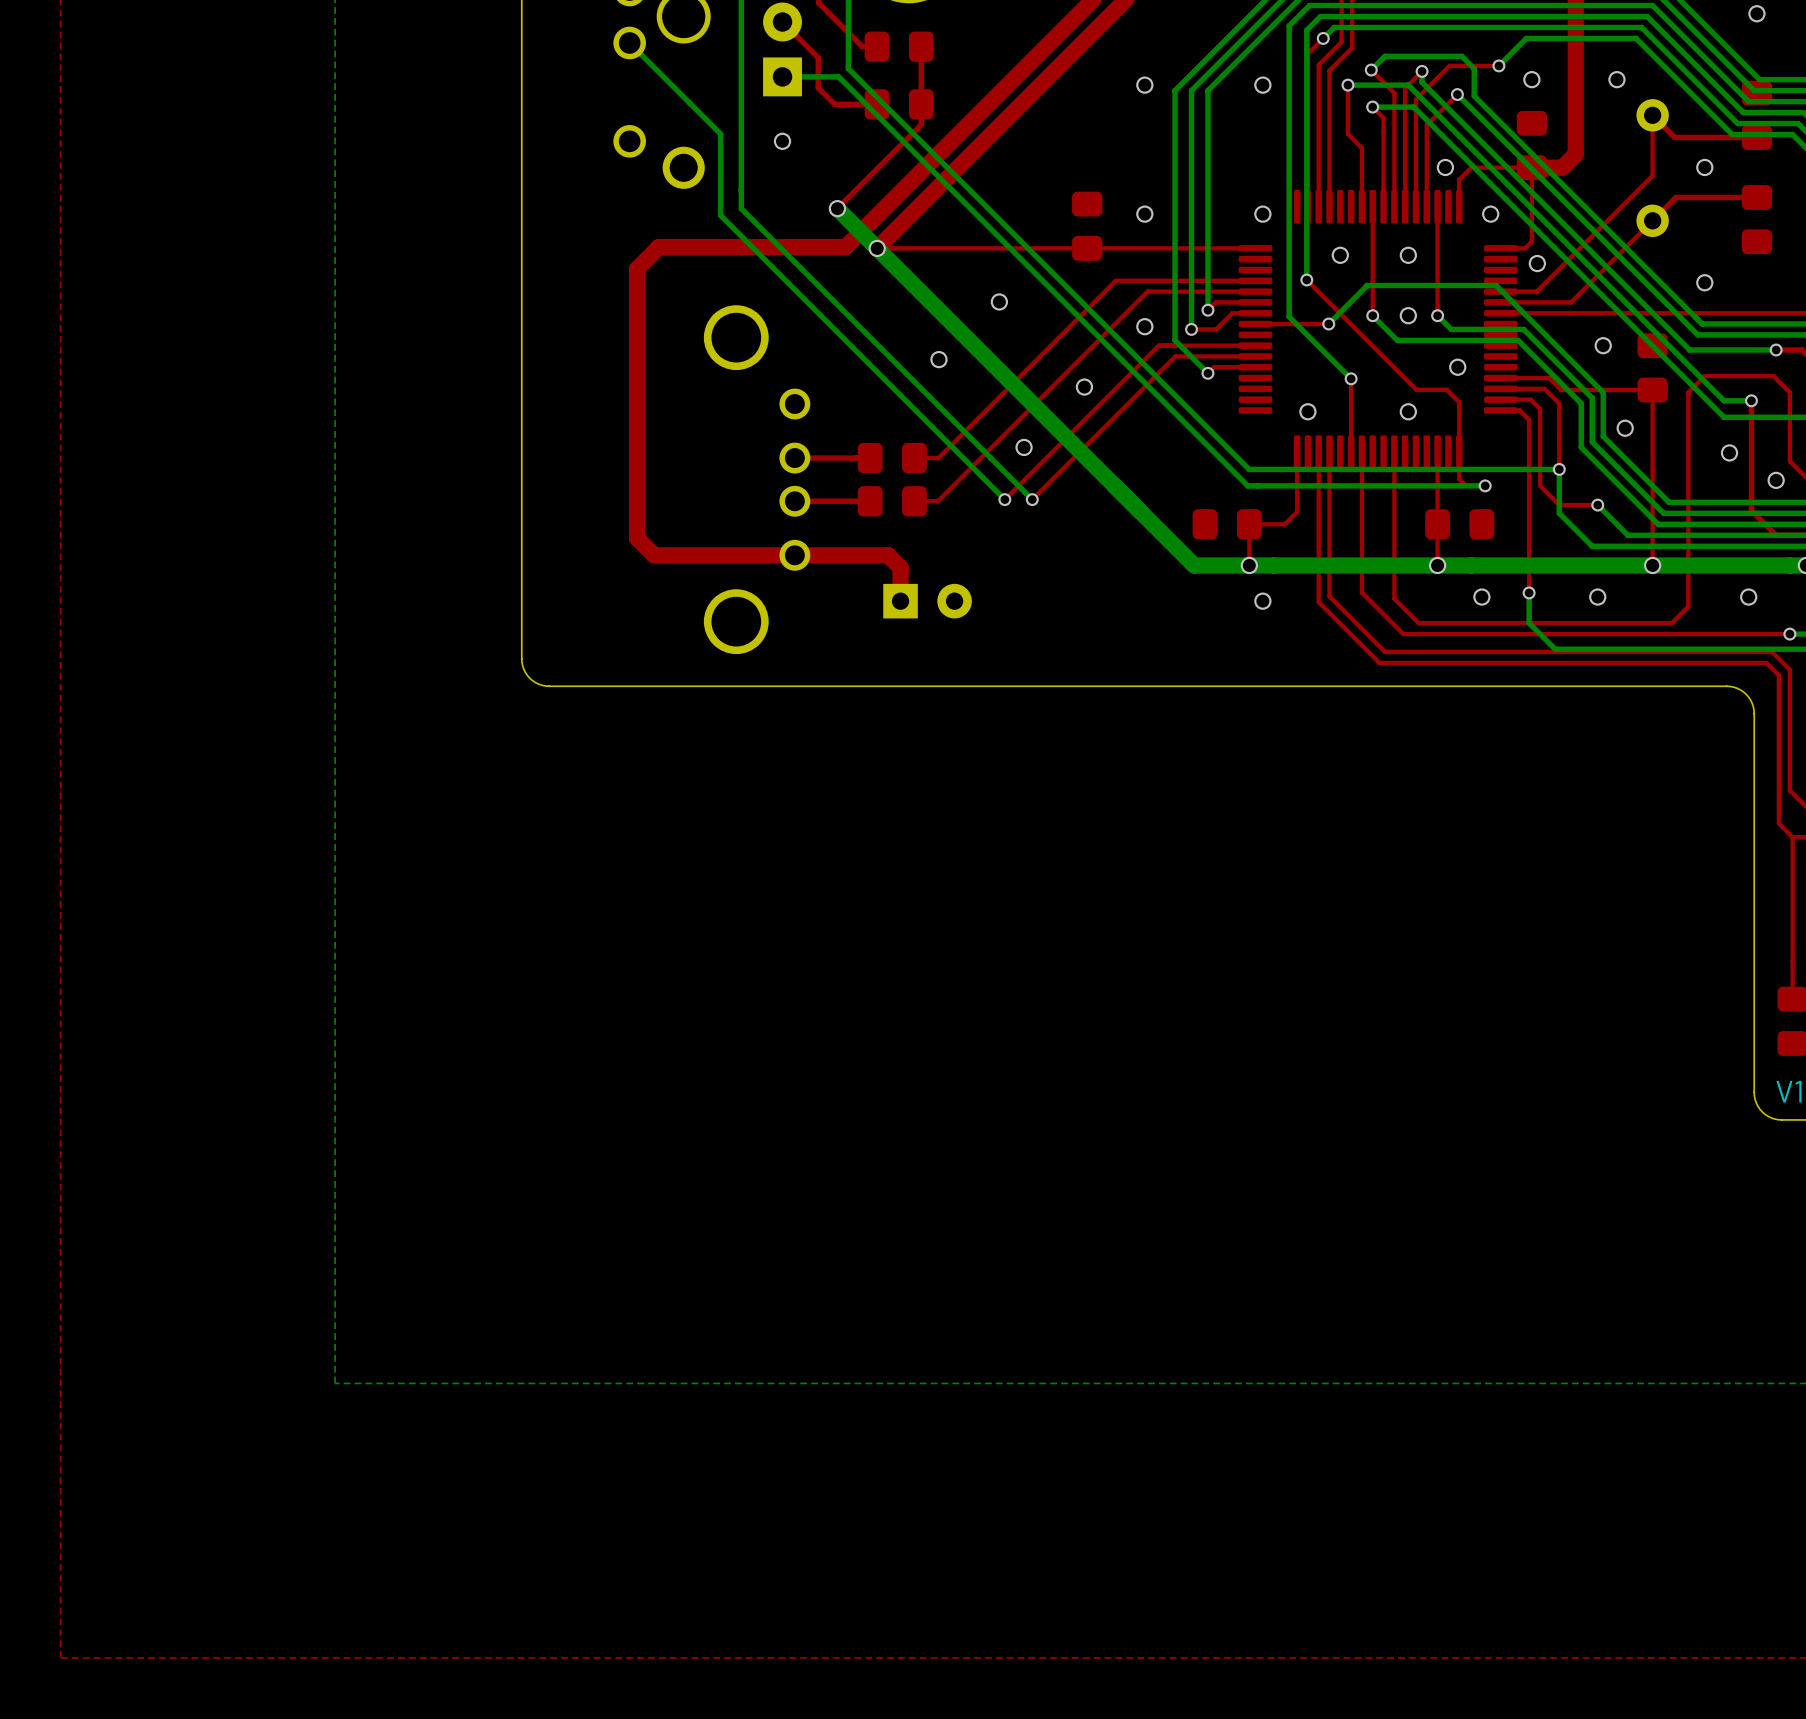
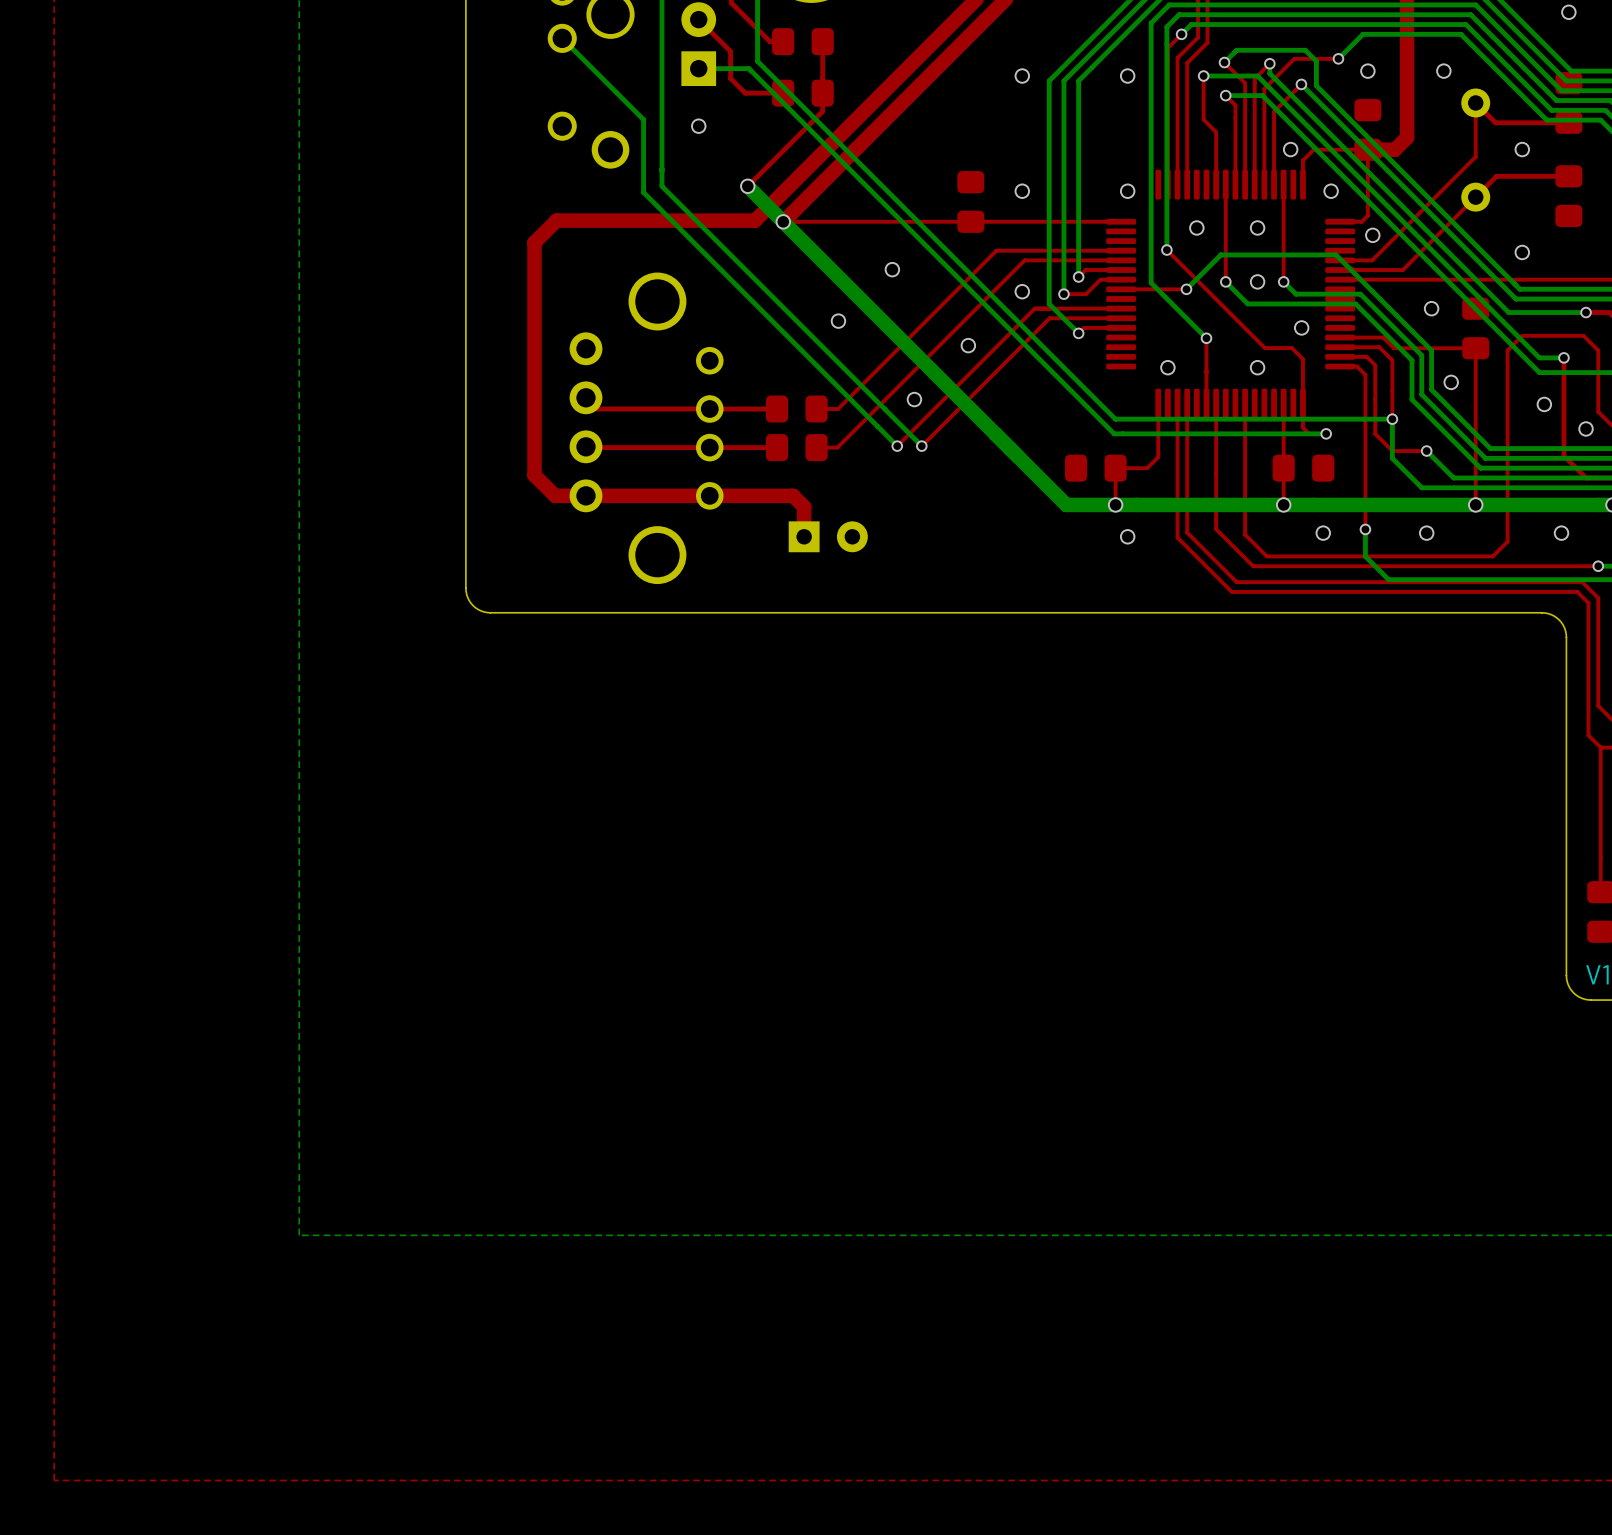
top track: (658, 247) (637, 269) (637, 538) (654, 555) -> (588, 220) (556, 220) (534, 242) (534, 475) (555, 495) (584, 495)
top track: none -> (586, 397) (597, 409) (709, 409)
part: none -> (586, 422)
top track: none -> (586, 446) (709, 447)

